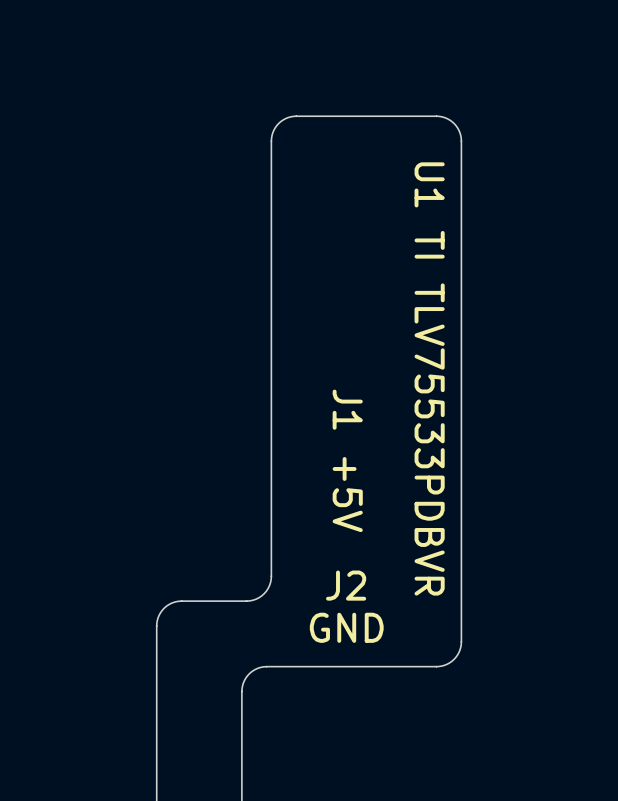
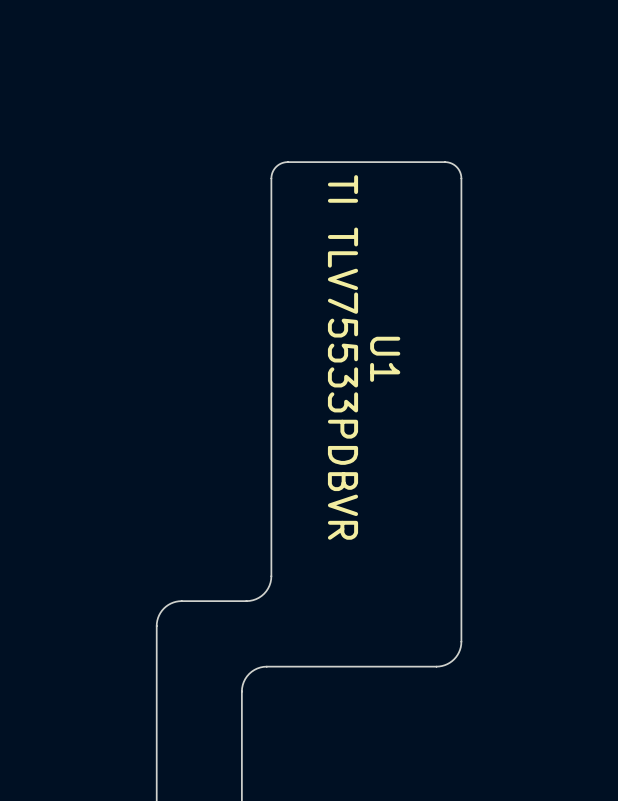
board edge: (461, 178) (460, 132) (449, 120) (436, 116) (288, 117) (278, 123) (272, 135) (271, 178) -> (461, 178) (456, 166) (445, 162) (285, 162) (274, 168) (271, 178)
text: none -> TI TLV75533PDBVR (342, 357)
text: none -> U1 (385, 359)
text: U1 TI TLV75533PDBVR (429, 378) -> none
text: J1 +5V (347, 460) -> none
text: J2 (346, 585) -> none
text: GND (346, 627) -> none

